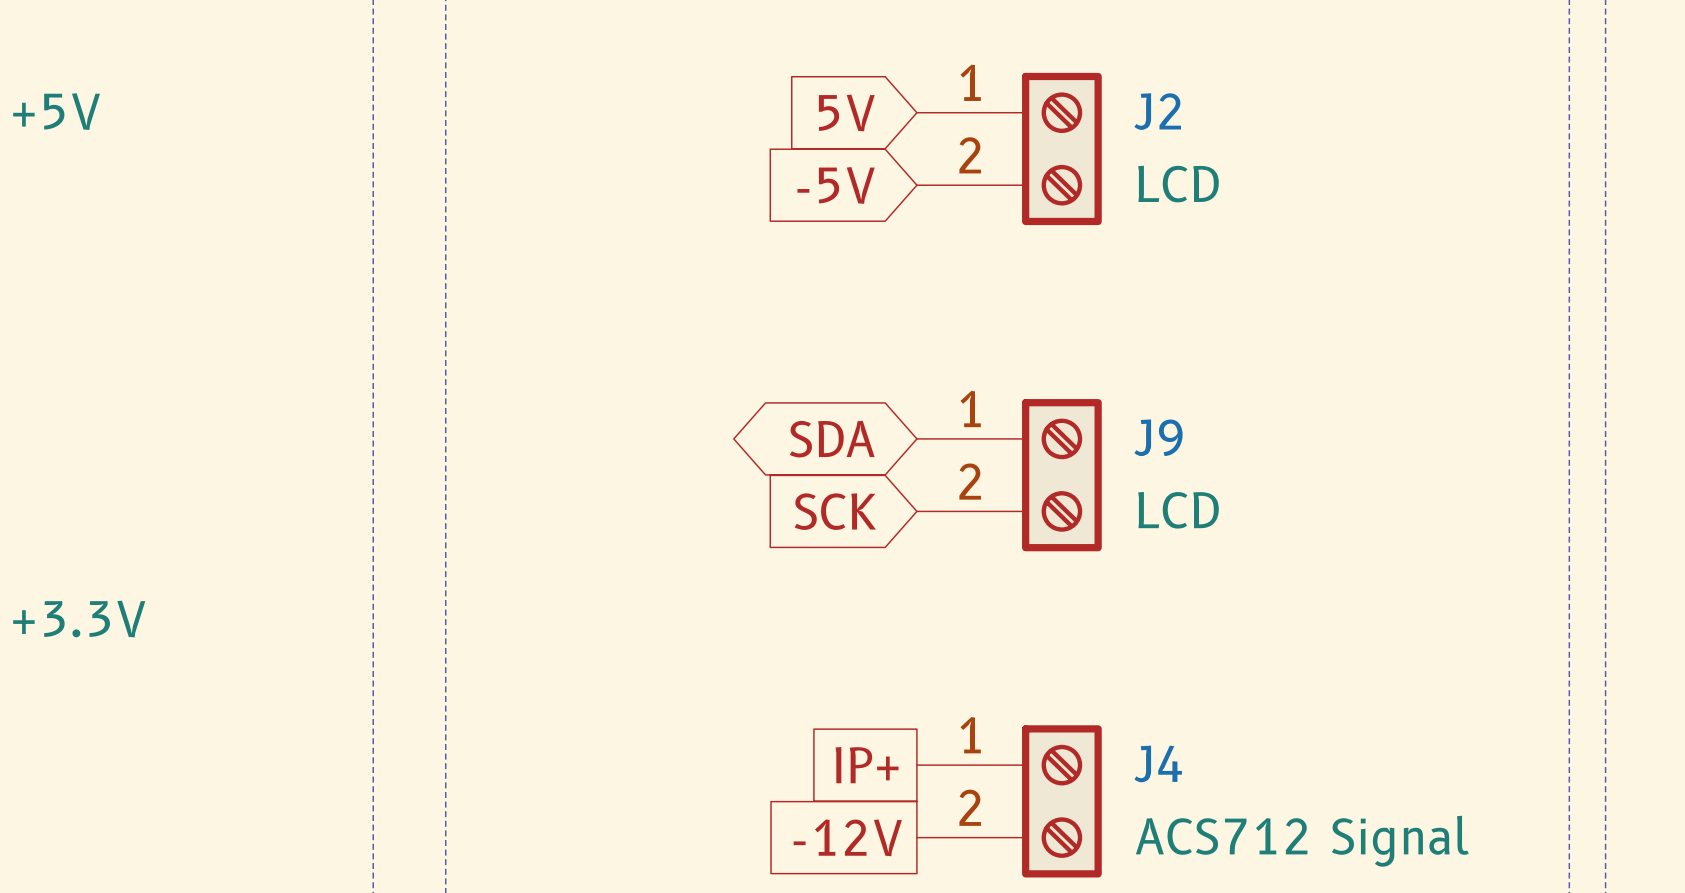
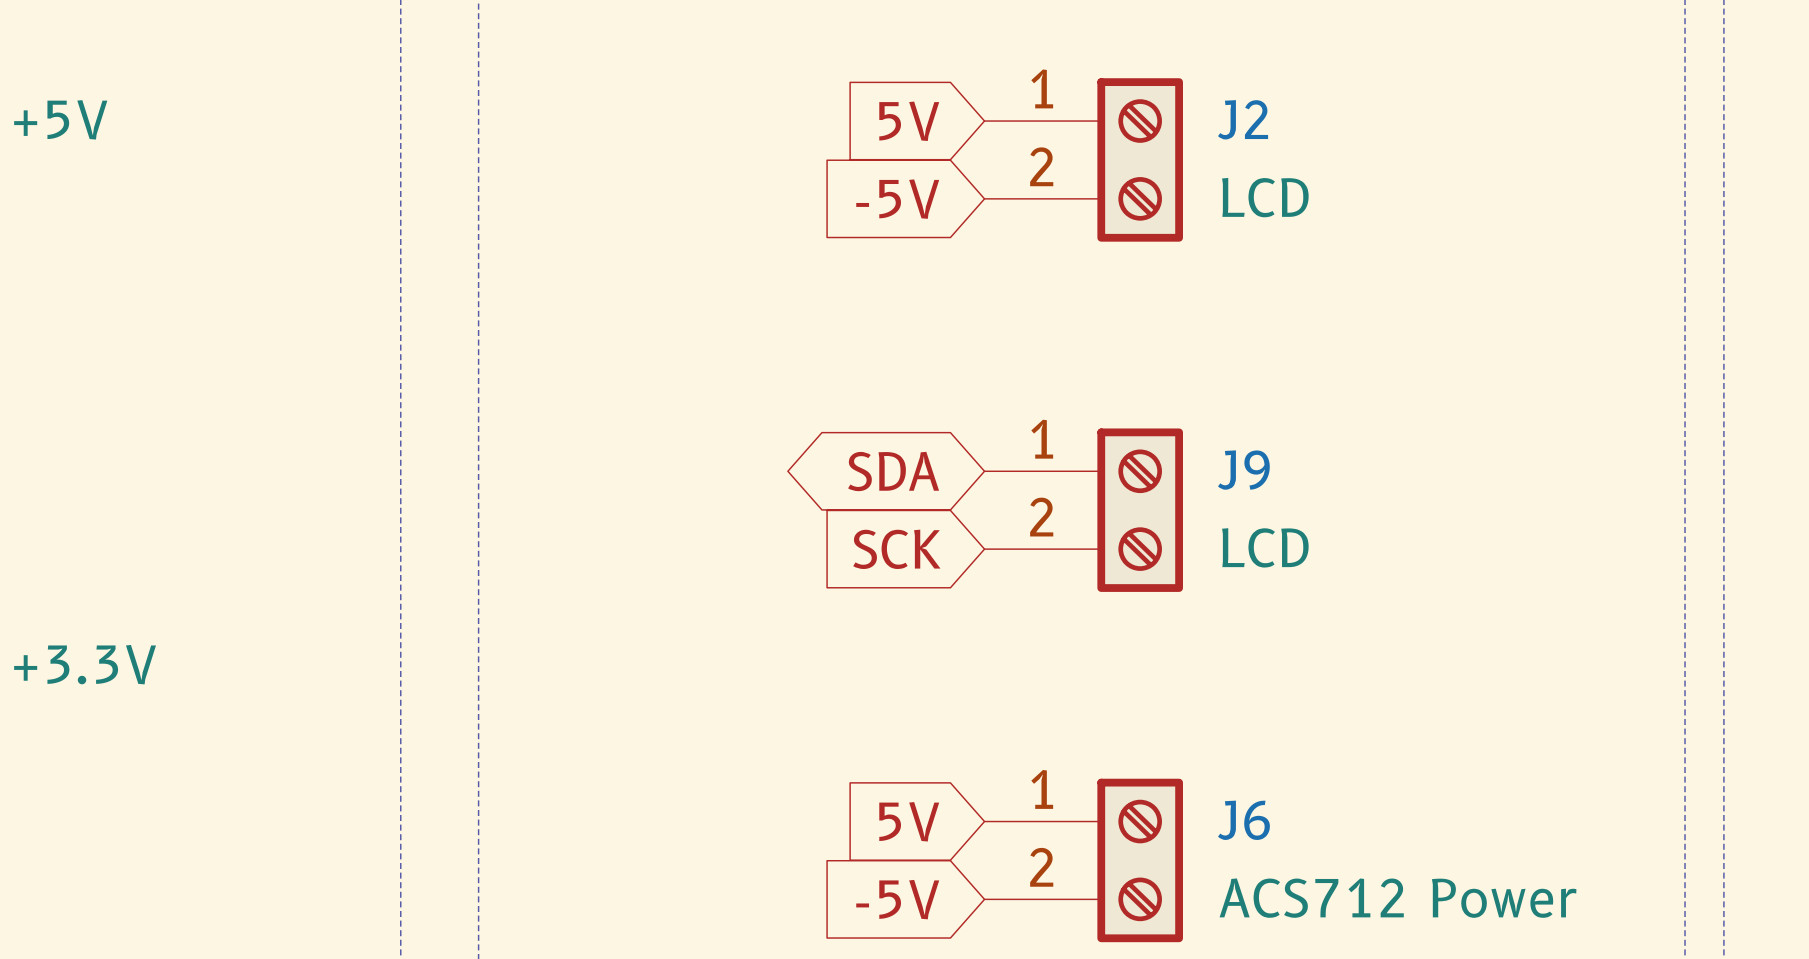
J4 name: J4 (1158, 763) -> J6 (1243, 820)
global label shape: passive (867, 765) -> input (909, 821)
global label: IP+ (867, 765) -> 5V (909, 821)
global label shape: passive (847, 837) -> input (897, 899)
global label: -12V (847, 837) -> -5V (897, 899)
J4 value: ACS712 Signal (1302, 841) -> ACS712 Power (1398, 898)

